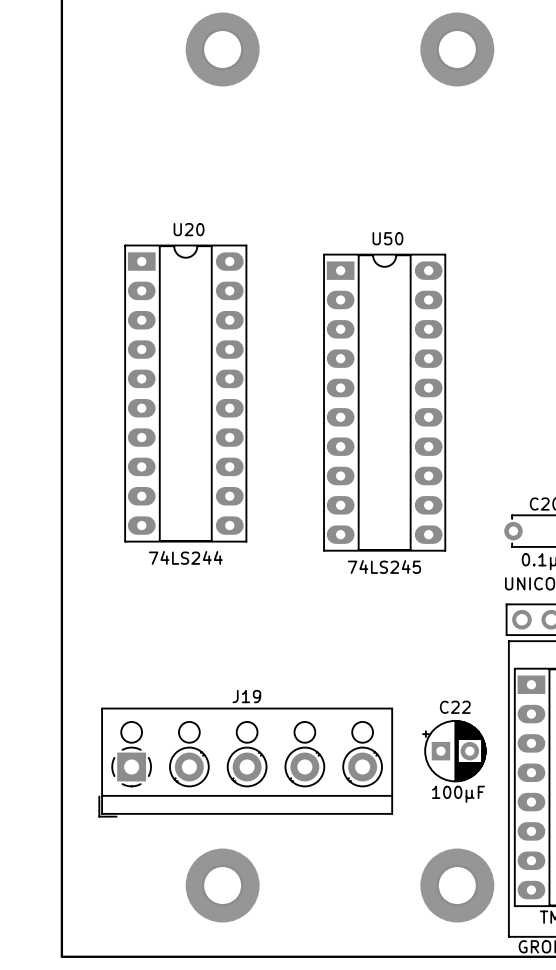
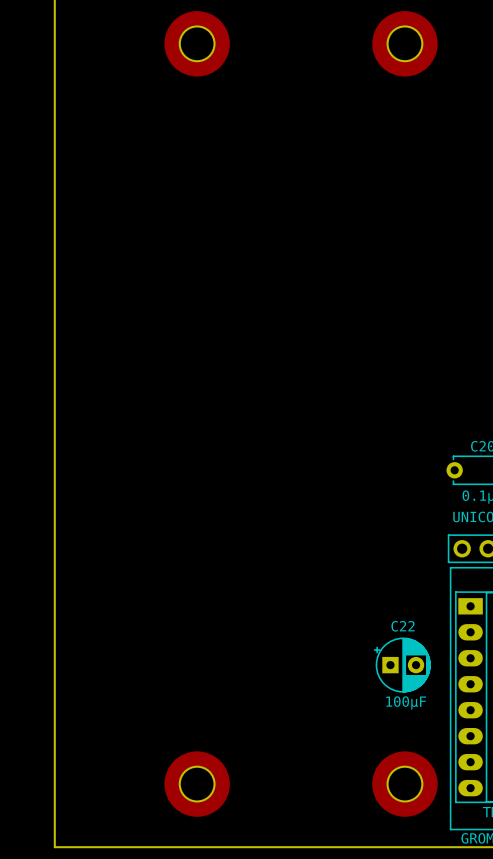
U20: 74LS244 (185, 393) -> none
U50: 74LS245 (384, 402) -> none
J19: (245, 762) -> none

